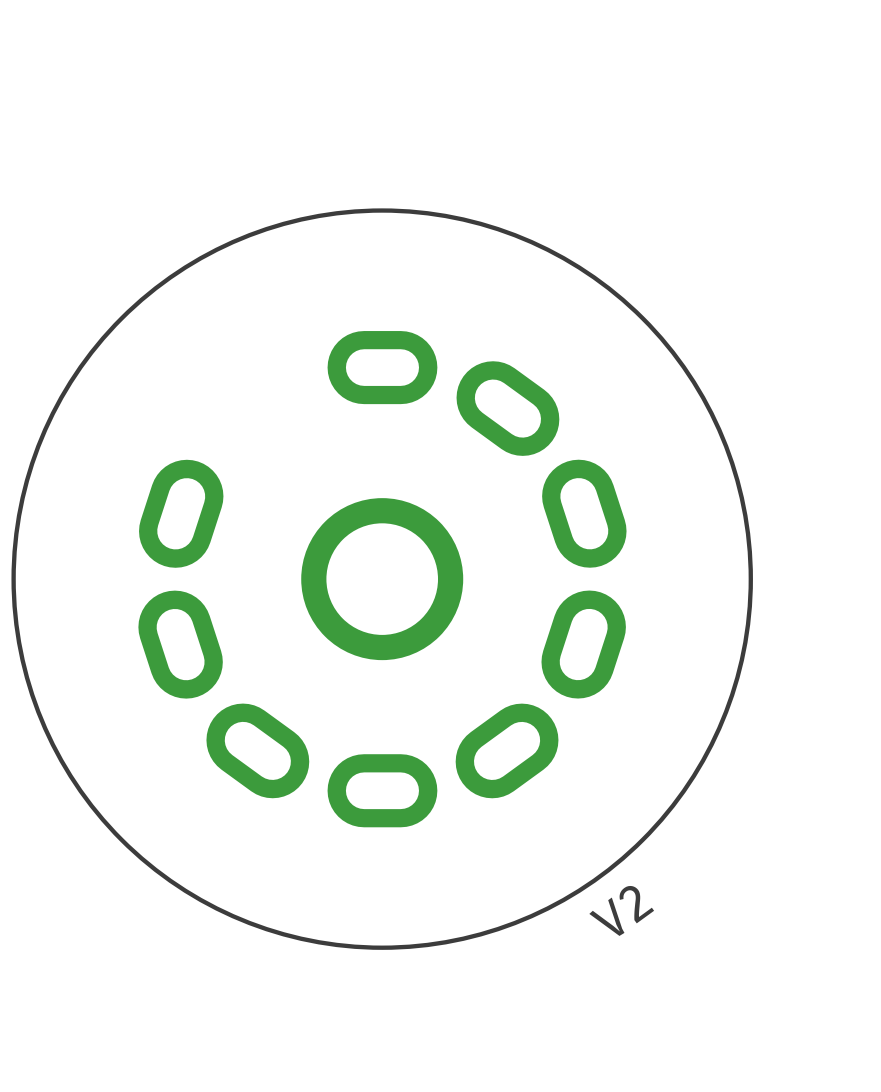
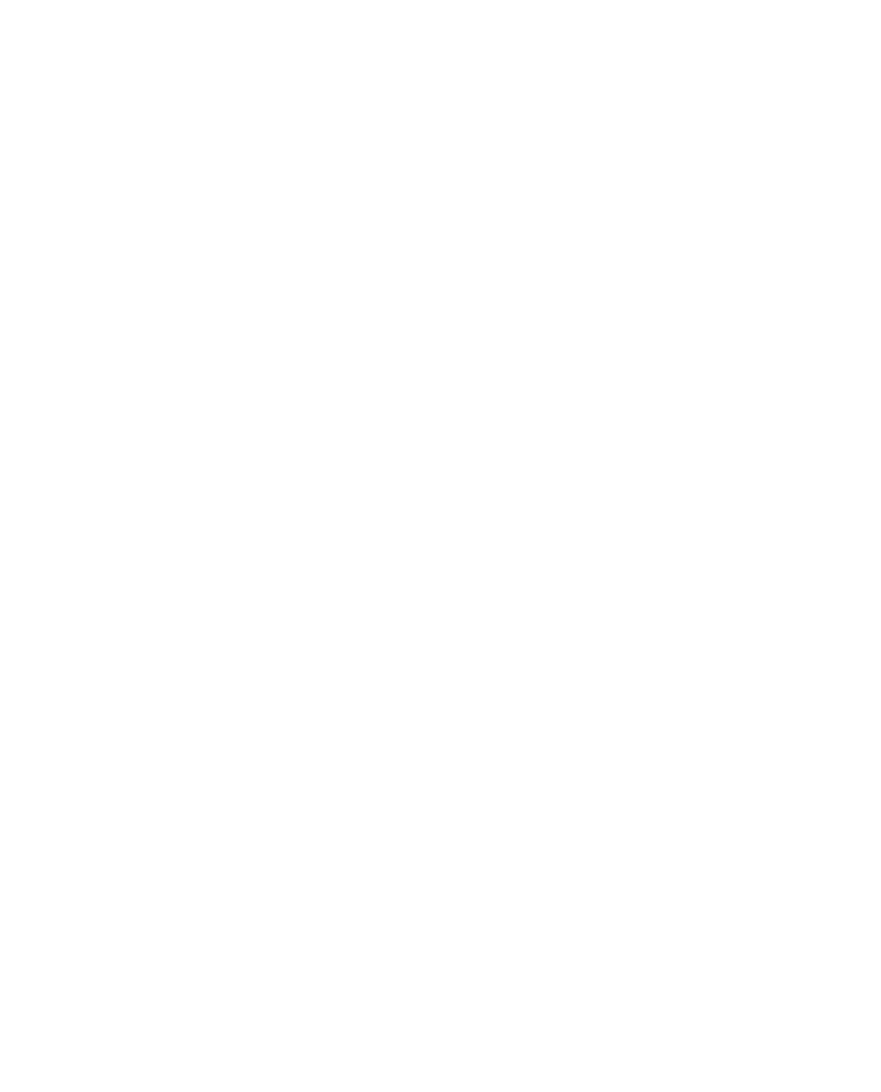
V2: (382, 579) -> none

